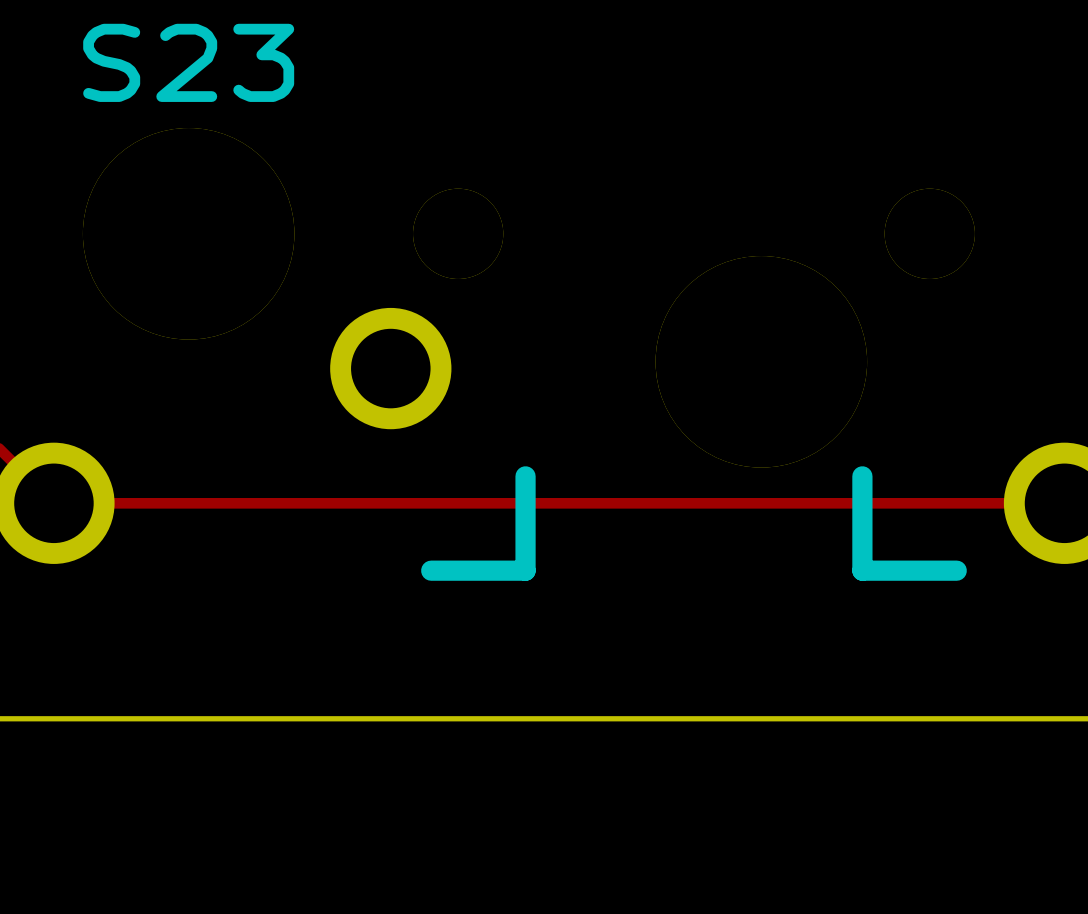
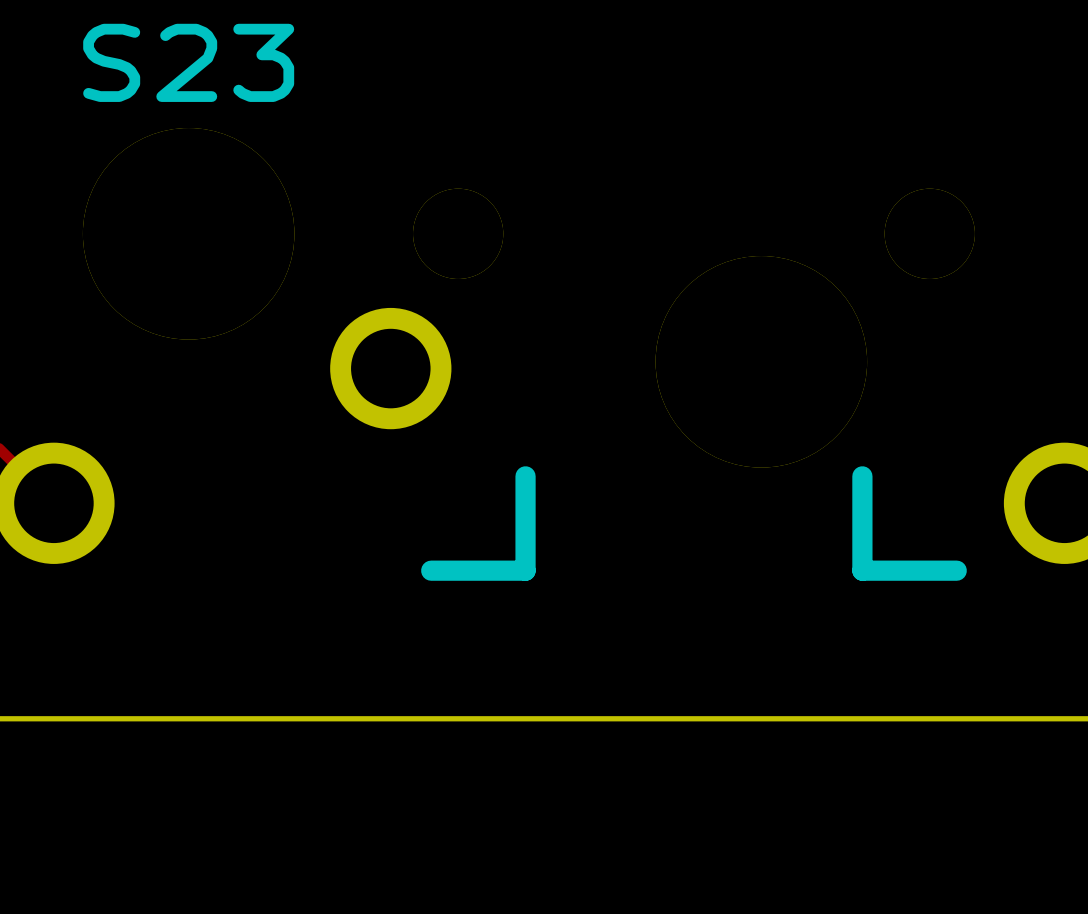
track: (53, 503) (1064, 503) -> none

